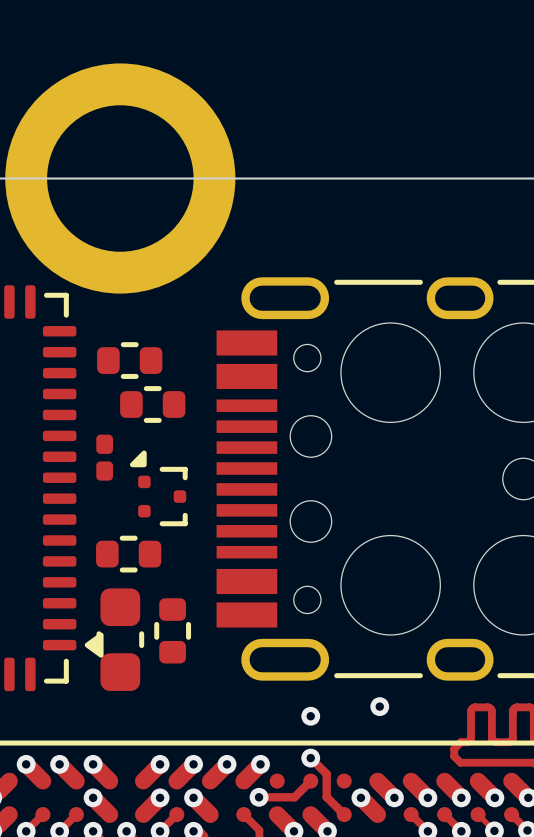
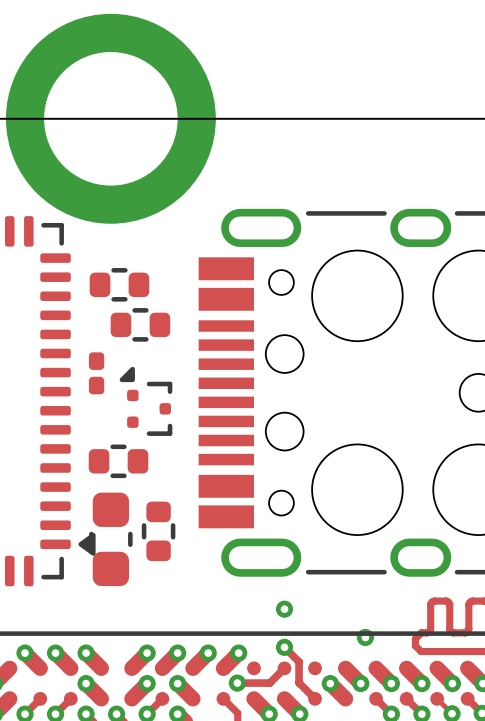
via position: (379, 706) -> (365, 637)

